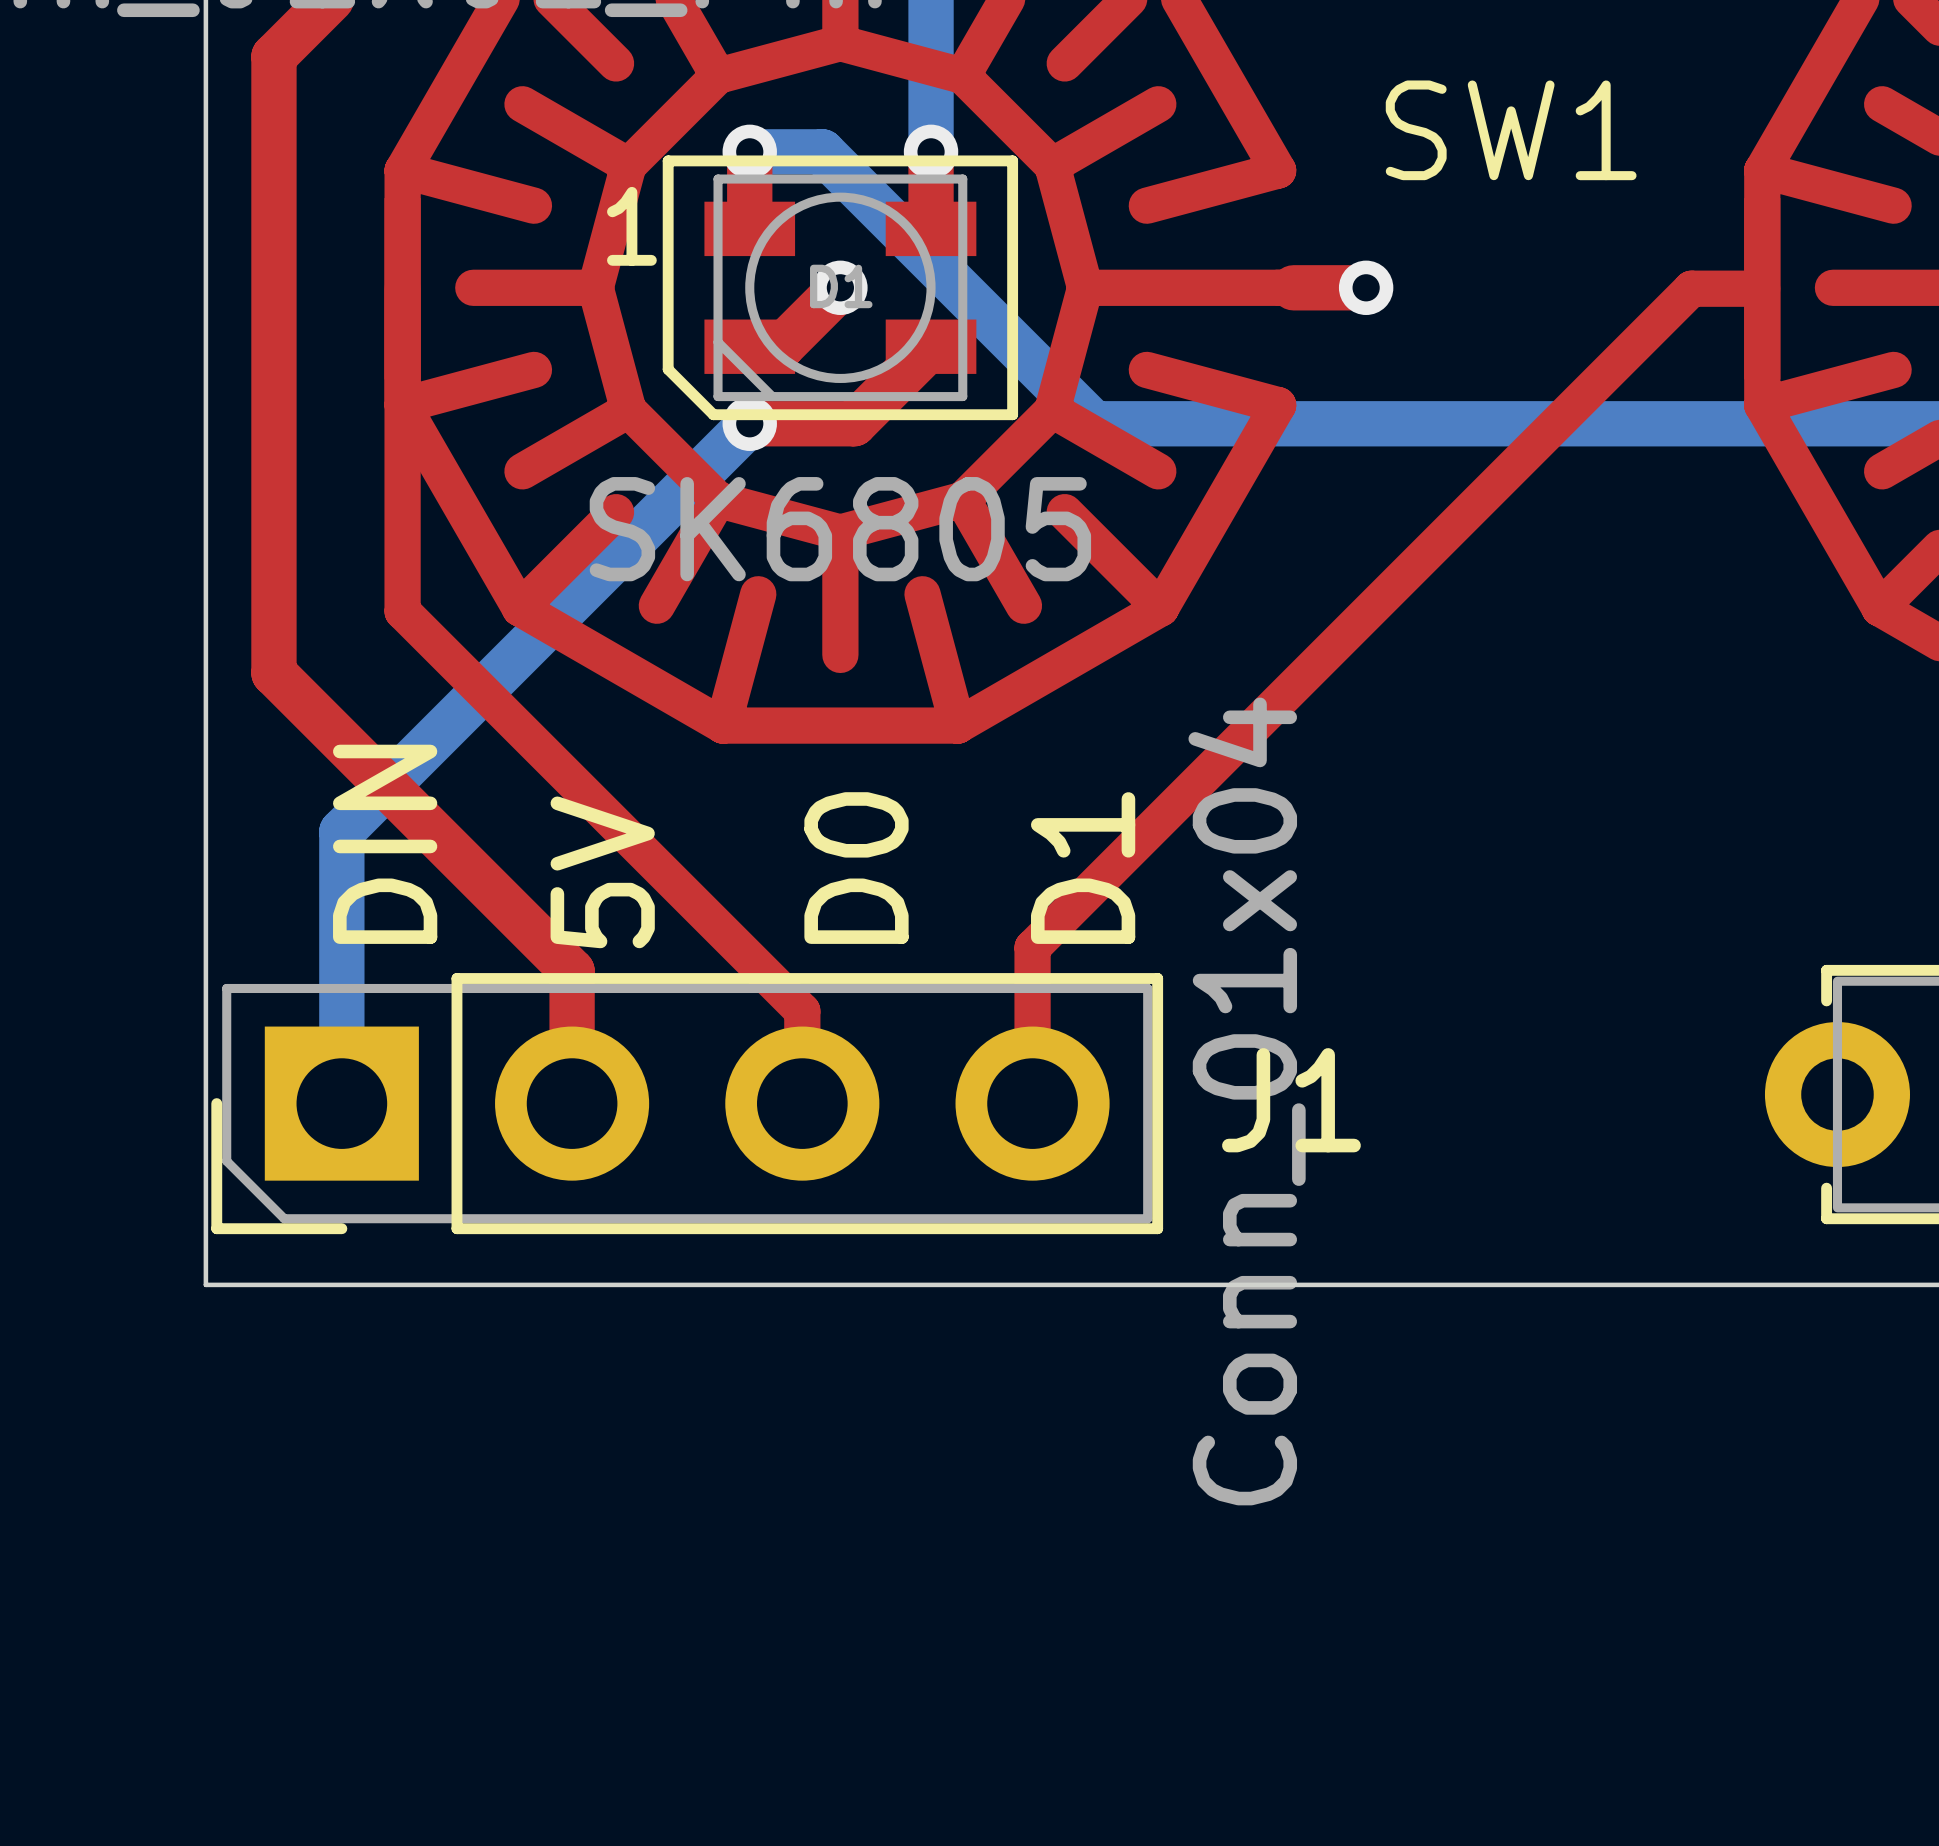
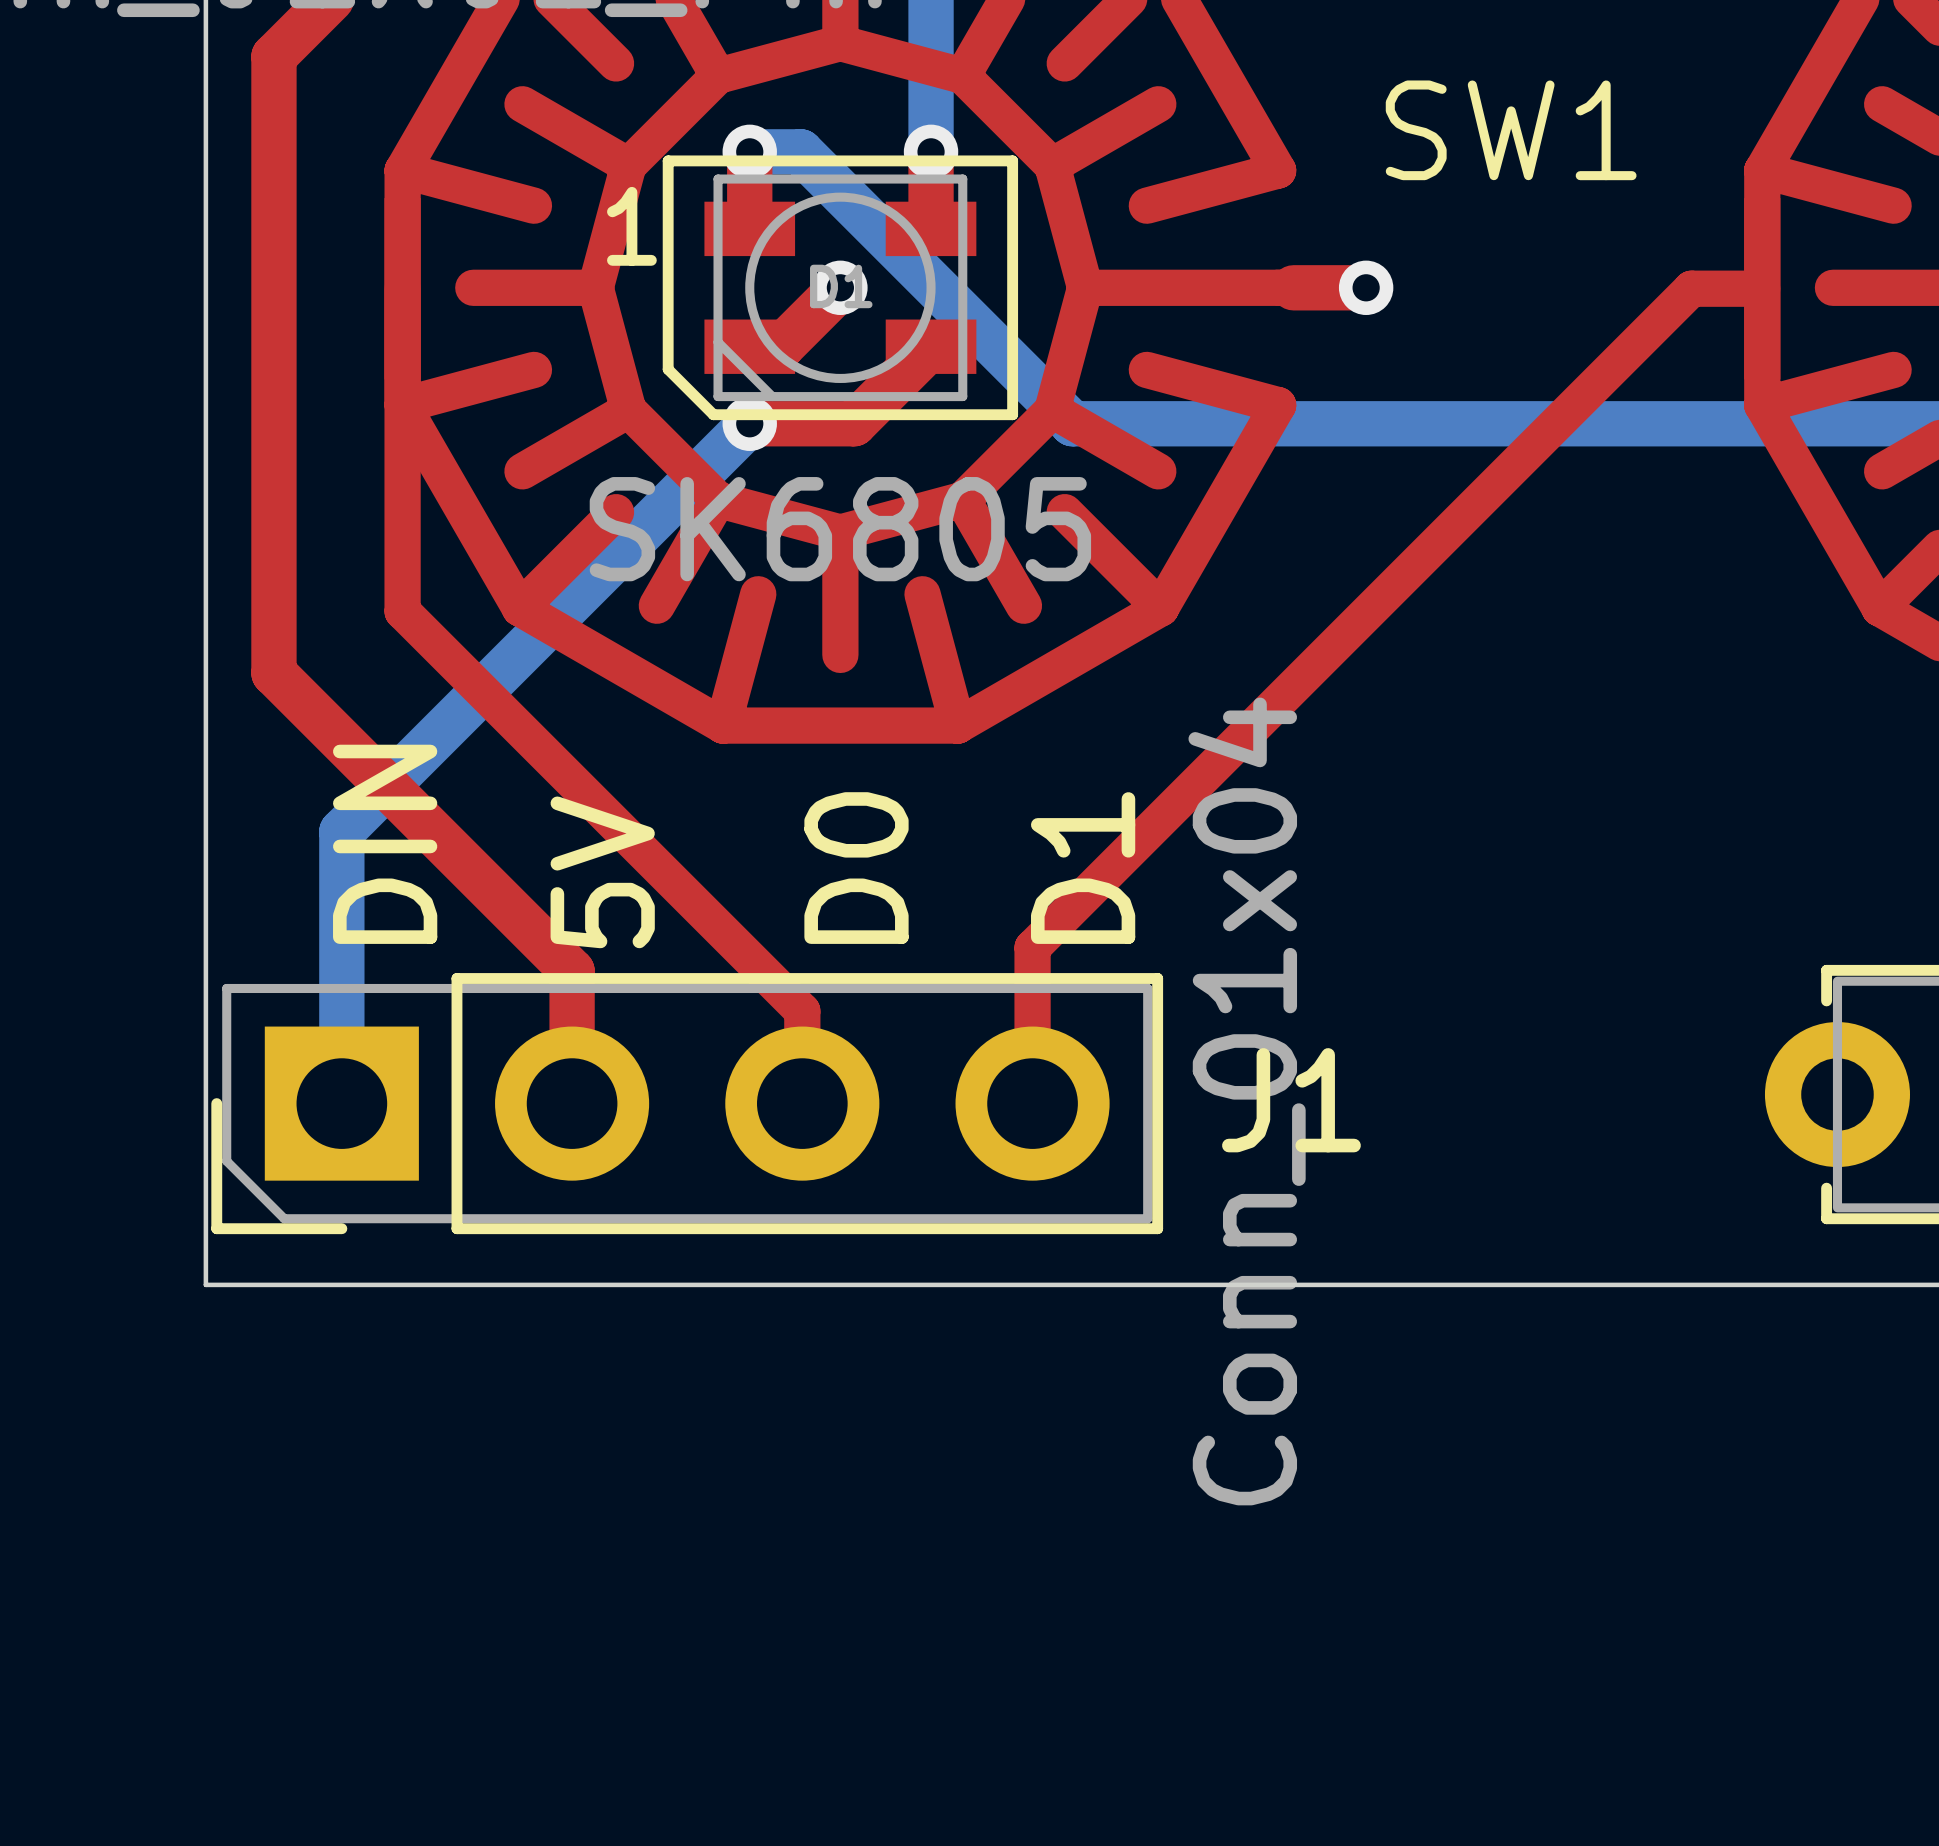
bottom track: (800, 151) (822, 151) (1094, 423) -> (800, 151) (1072, 423) (1094, 423)

